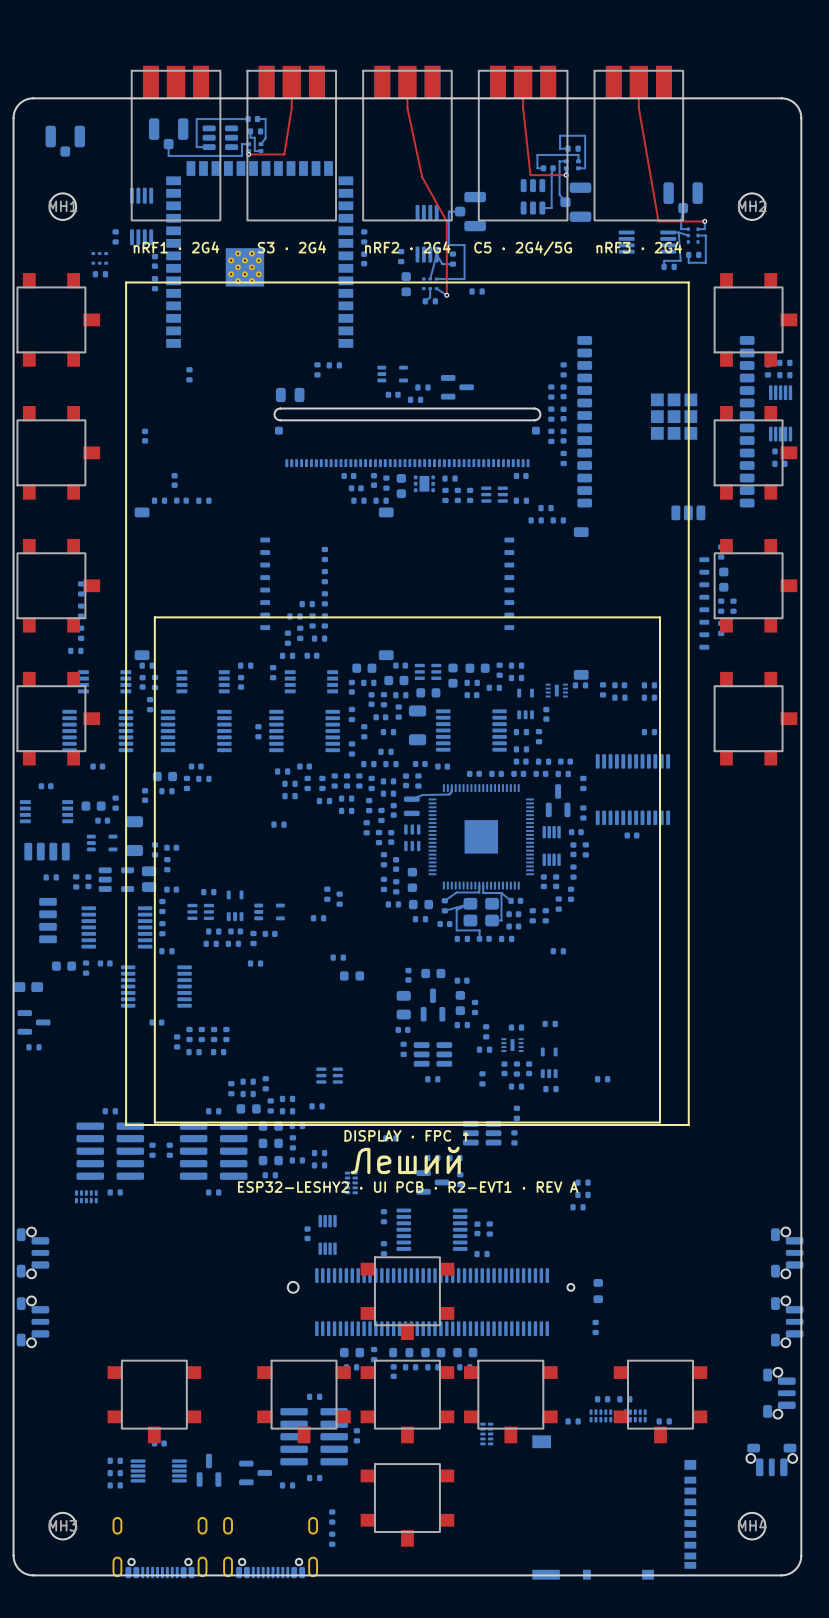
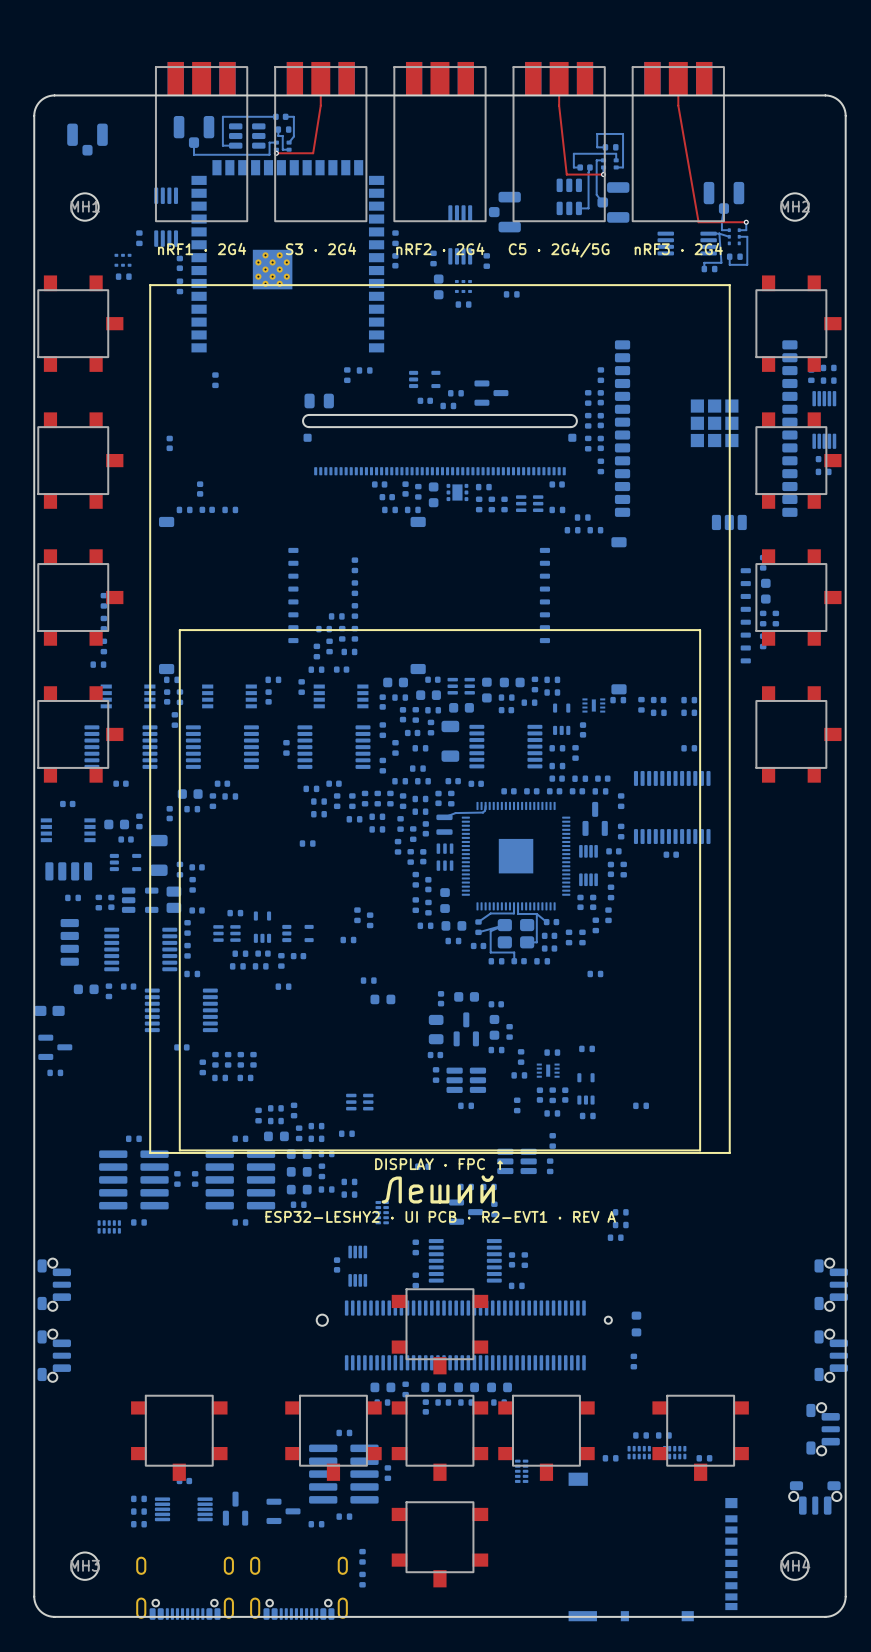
top track: (407, 82) (407, 108) (422, 177) (446, 221) (446, 295) -> none
bottom track: (460, 211) (448, 211) (448, 245) (464, 245) (464, 278) (436, 278) -> none
bottom track: (452, 264) (442, 264) (436, 254) (430, 278) -> none
bottom track: (430, 288) (430, 297) (425, 301) -> none
bottom track: (436, 288) (446, 295) -> none
via: (446, 295) -> none

